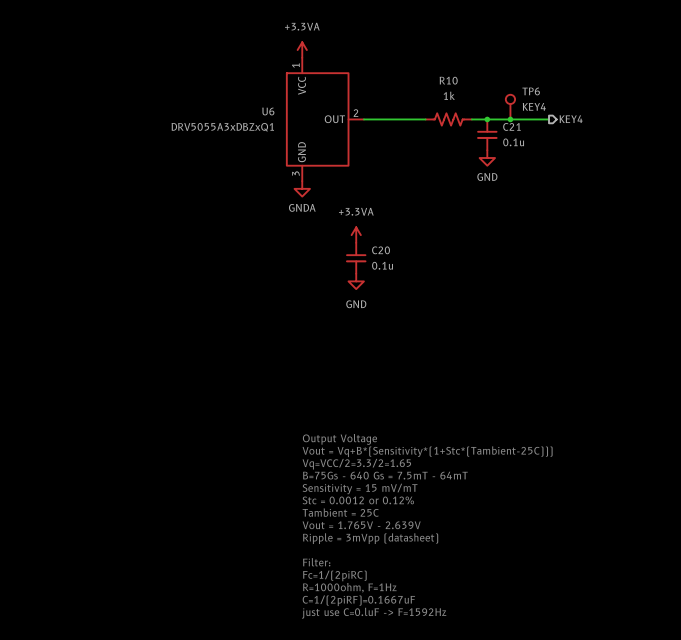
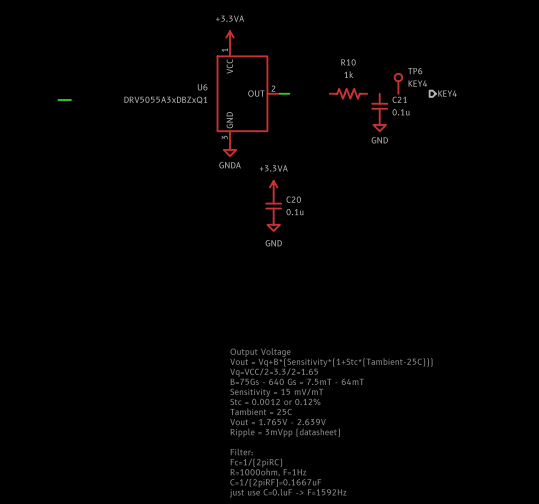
wire: (375, 119) (425, 119) -> none
wire: (471, 119) (549, 119) -> none
junction: (487, 119) -> none
junction: (510, 119) -> none
wire: none -> (58, 100) (70, 100)

